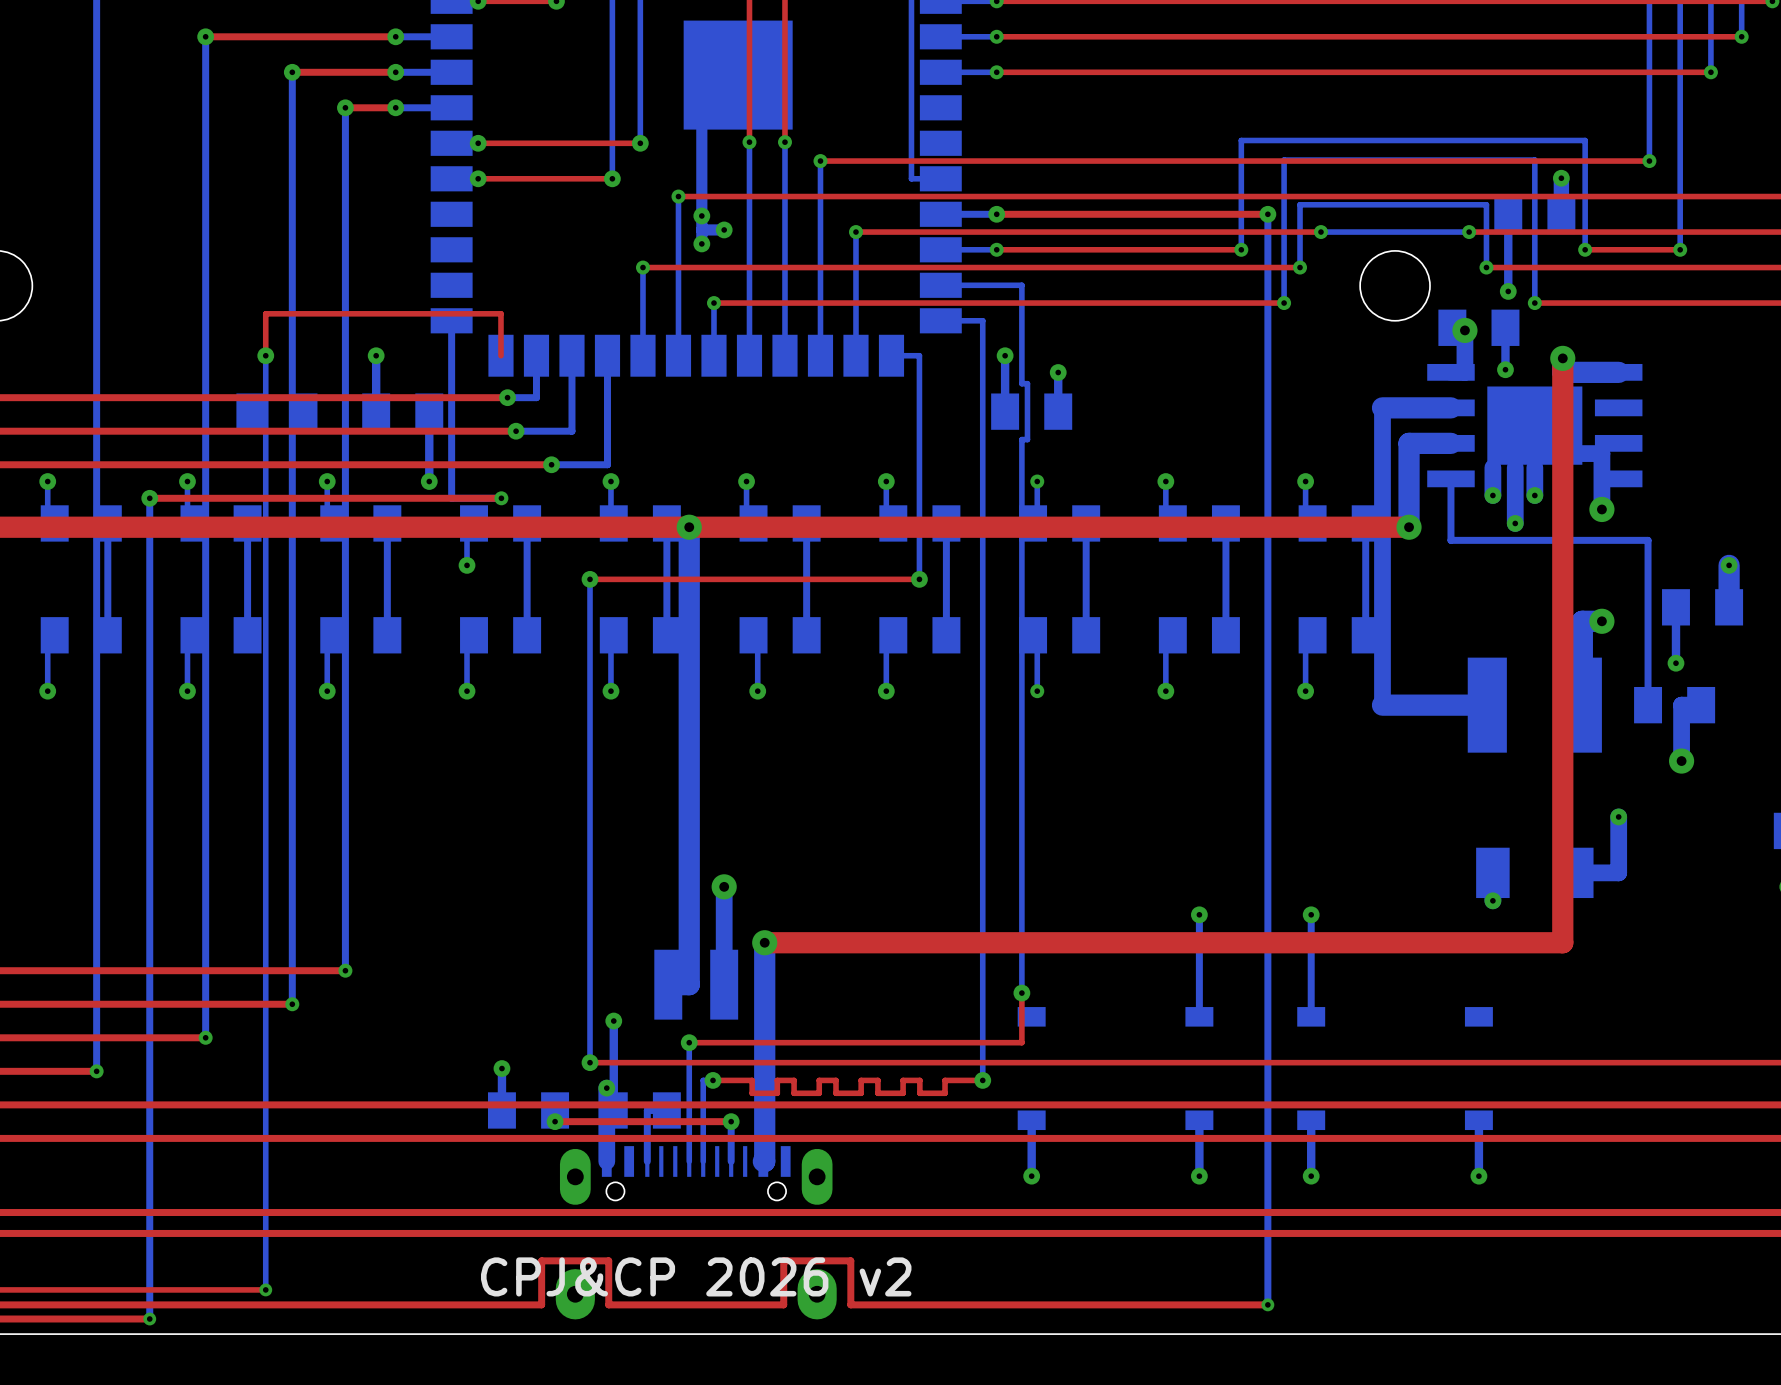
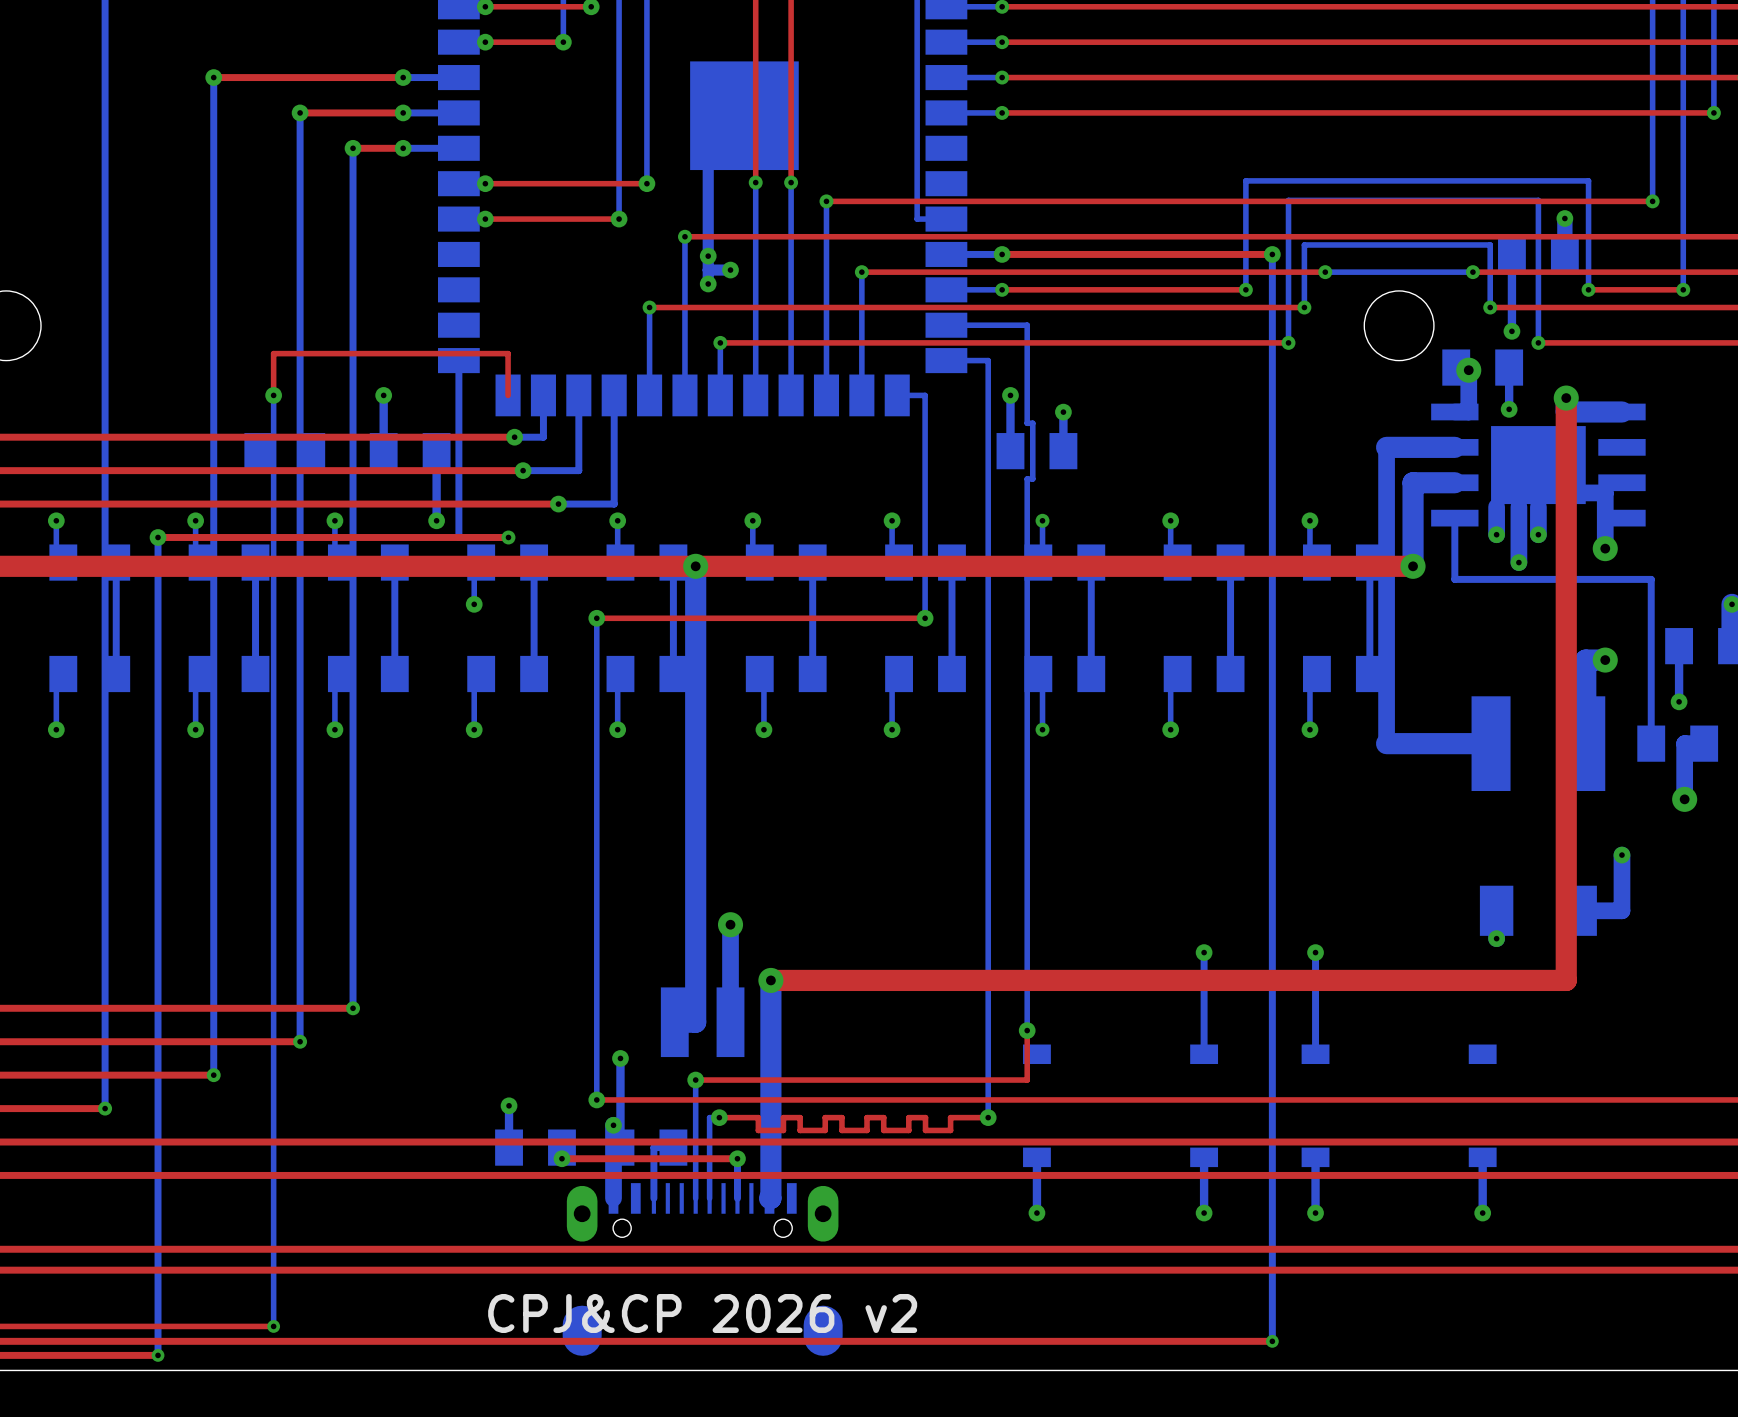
part footprint: [555, 1146, 837, 1320] -> [562, 1183, 843, 1356]
top track: (541, 1304) (541, 1260) (608, 1260) (608, 1304) -> (548, 1341) (615, 1341)
top track: (783, 1304) (783, 1260) (850, 1260) (850, 1304) -> (789, 1341) (856, 1341)

